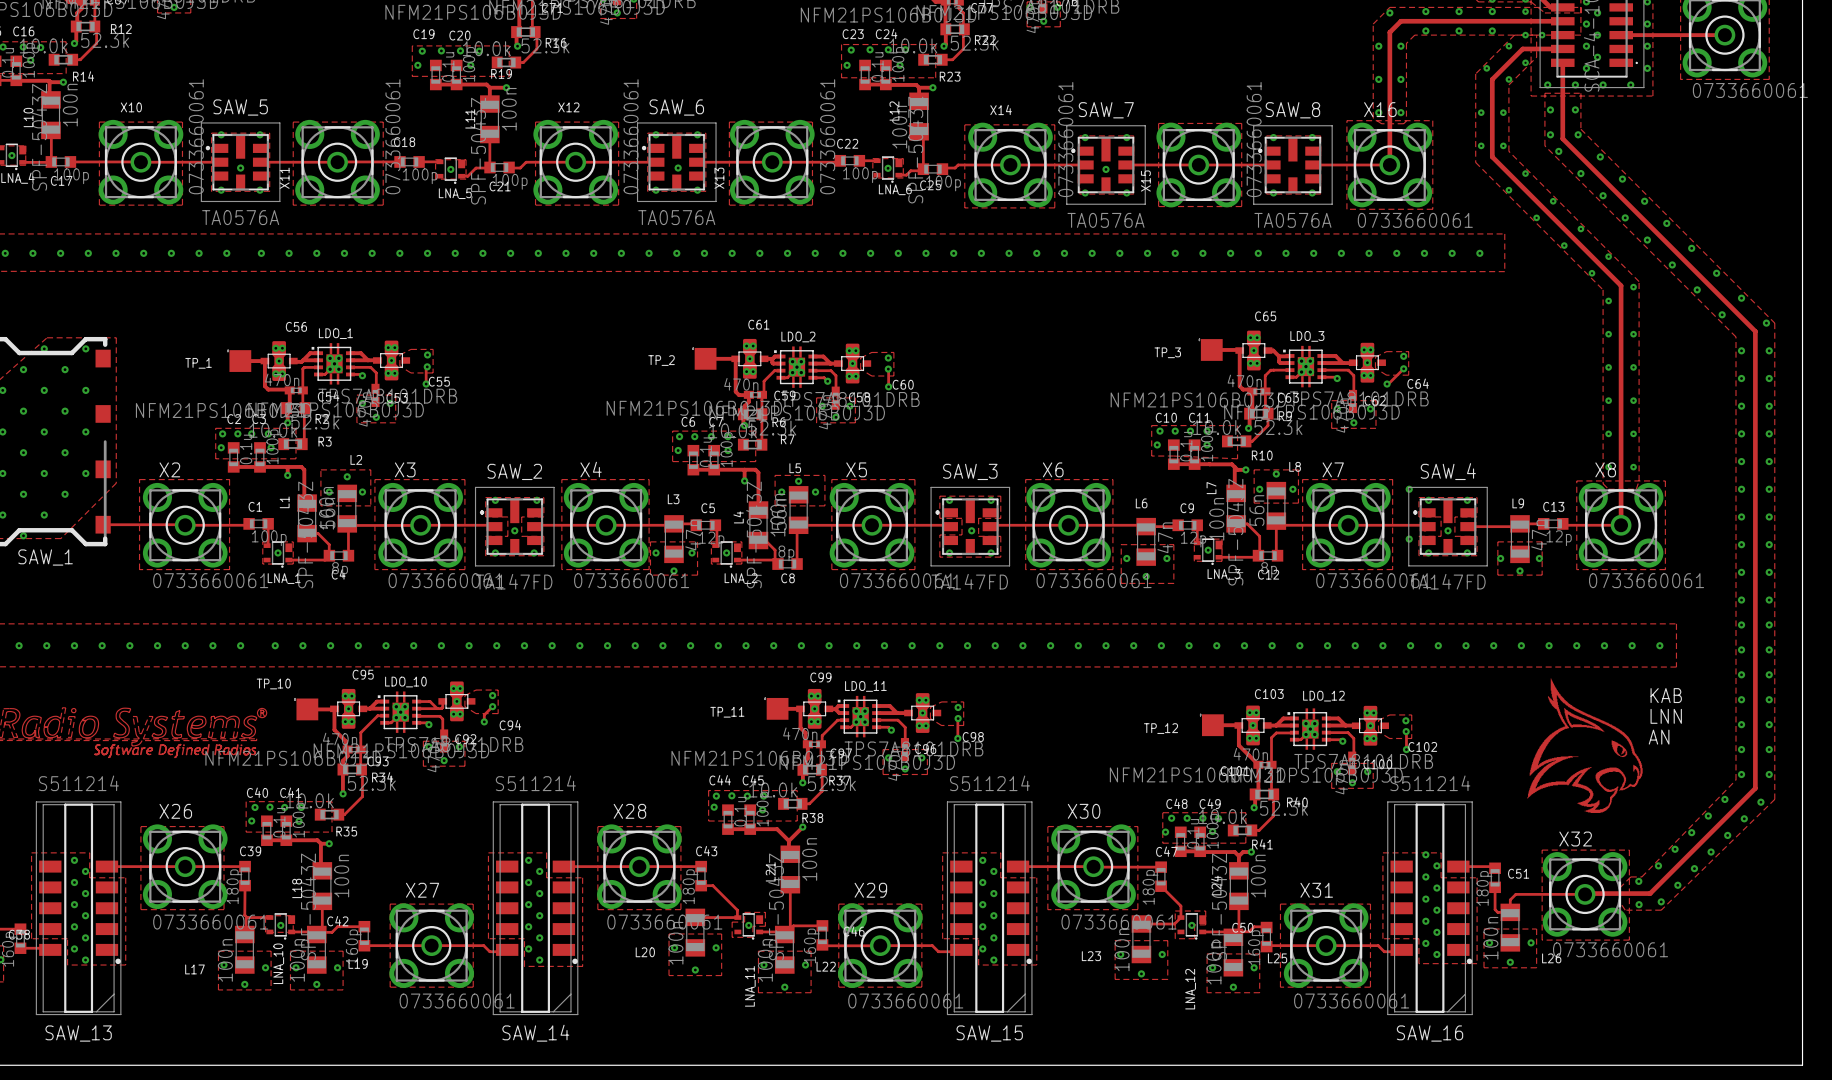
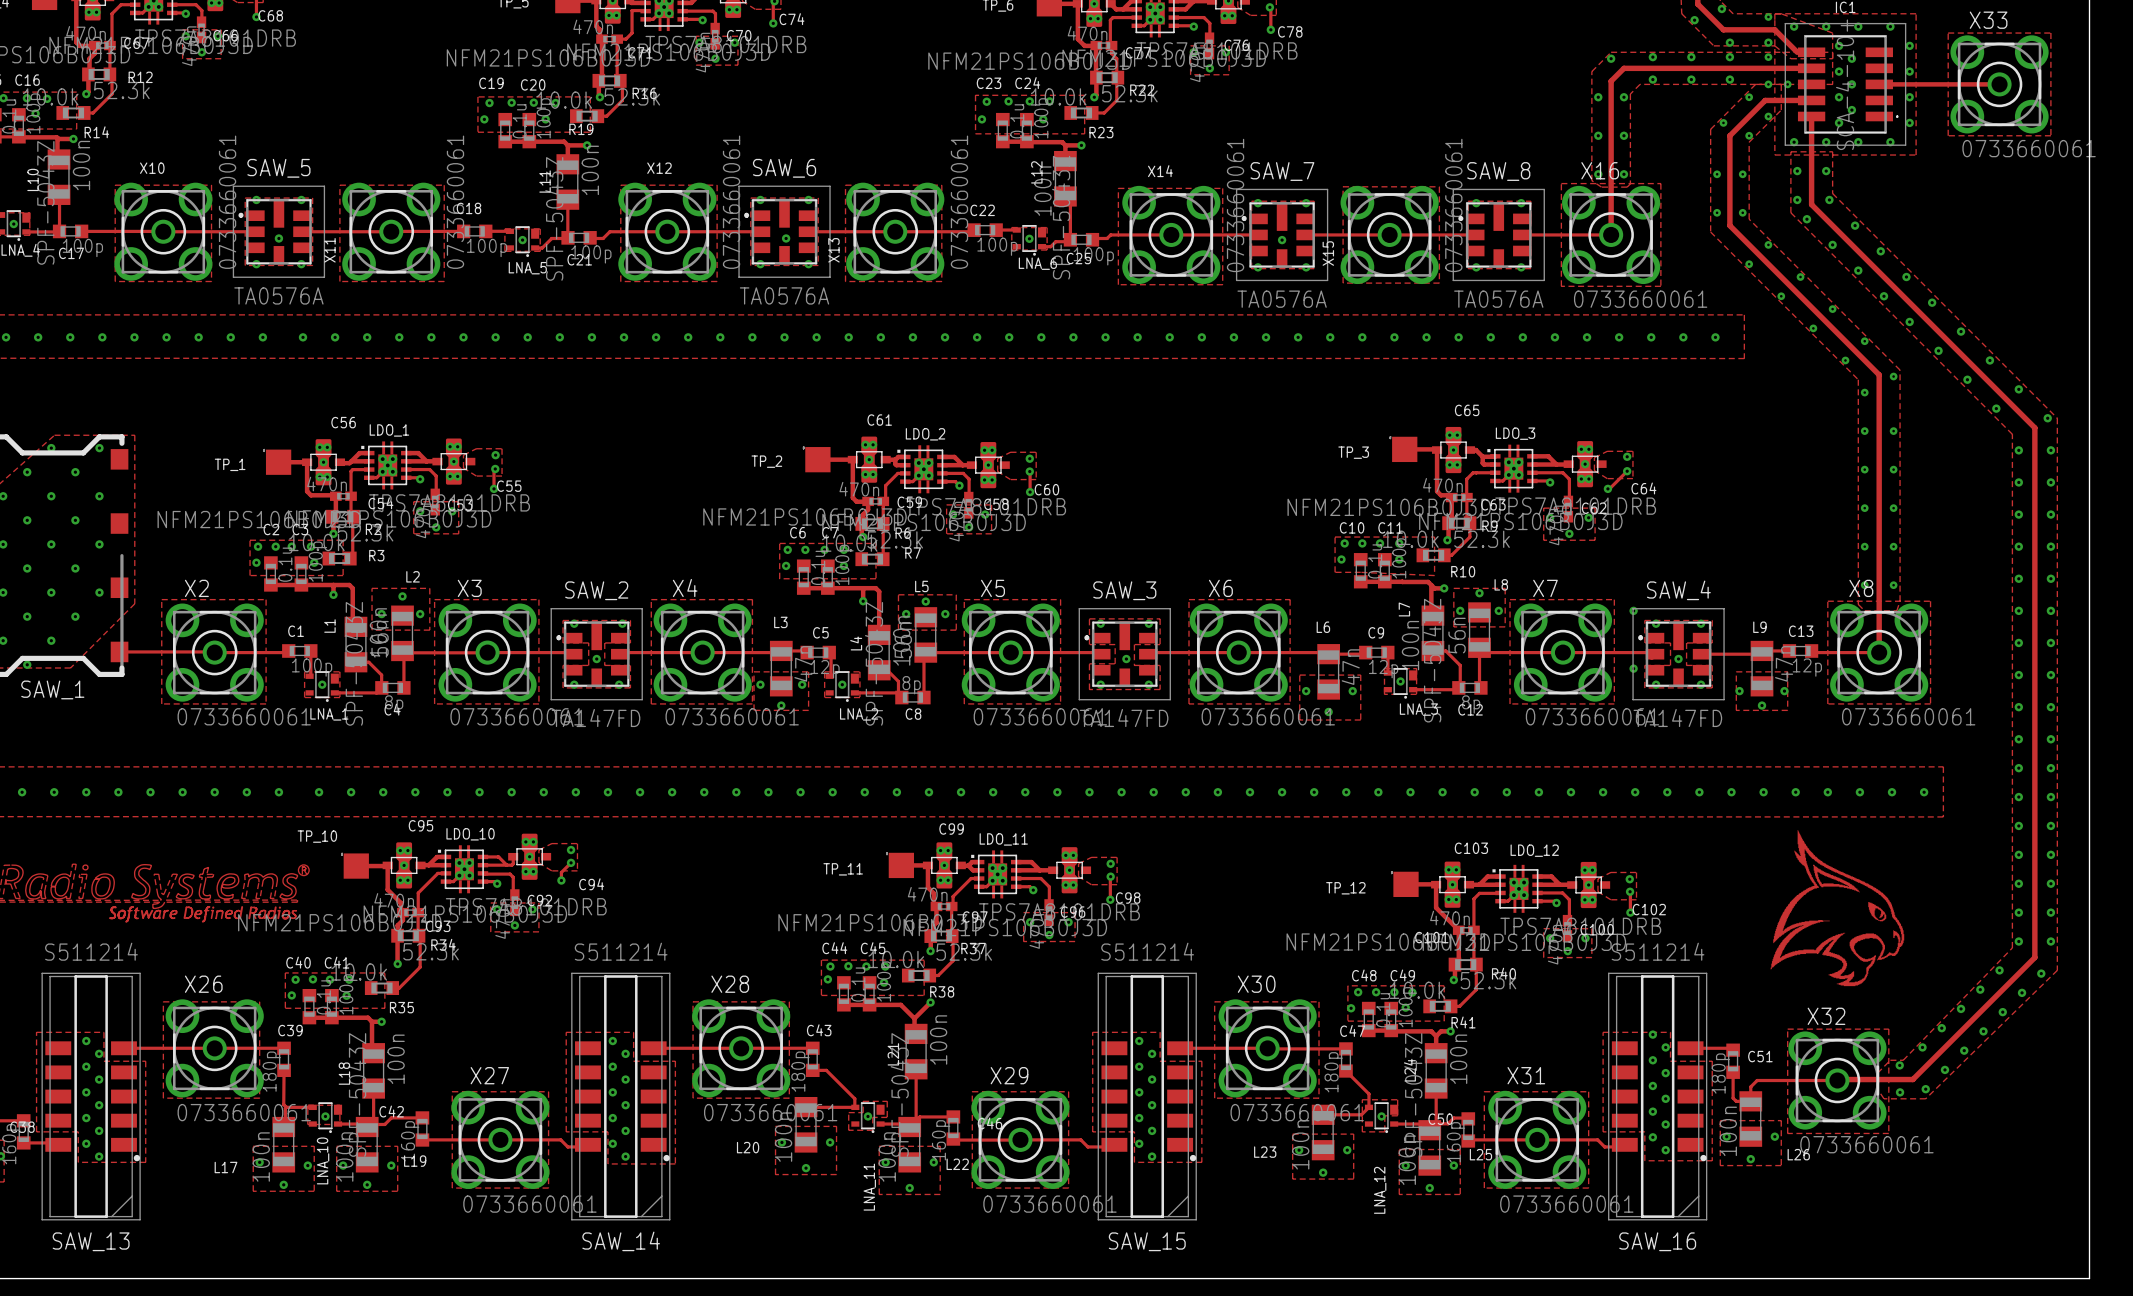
text: KAB (1666, 695) -> none
text: LNN (1666, 716) -> none
text: AN (1659, 737) -> none

